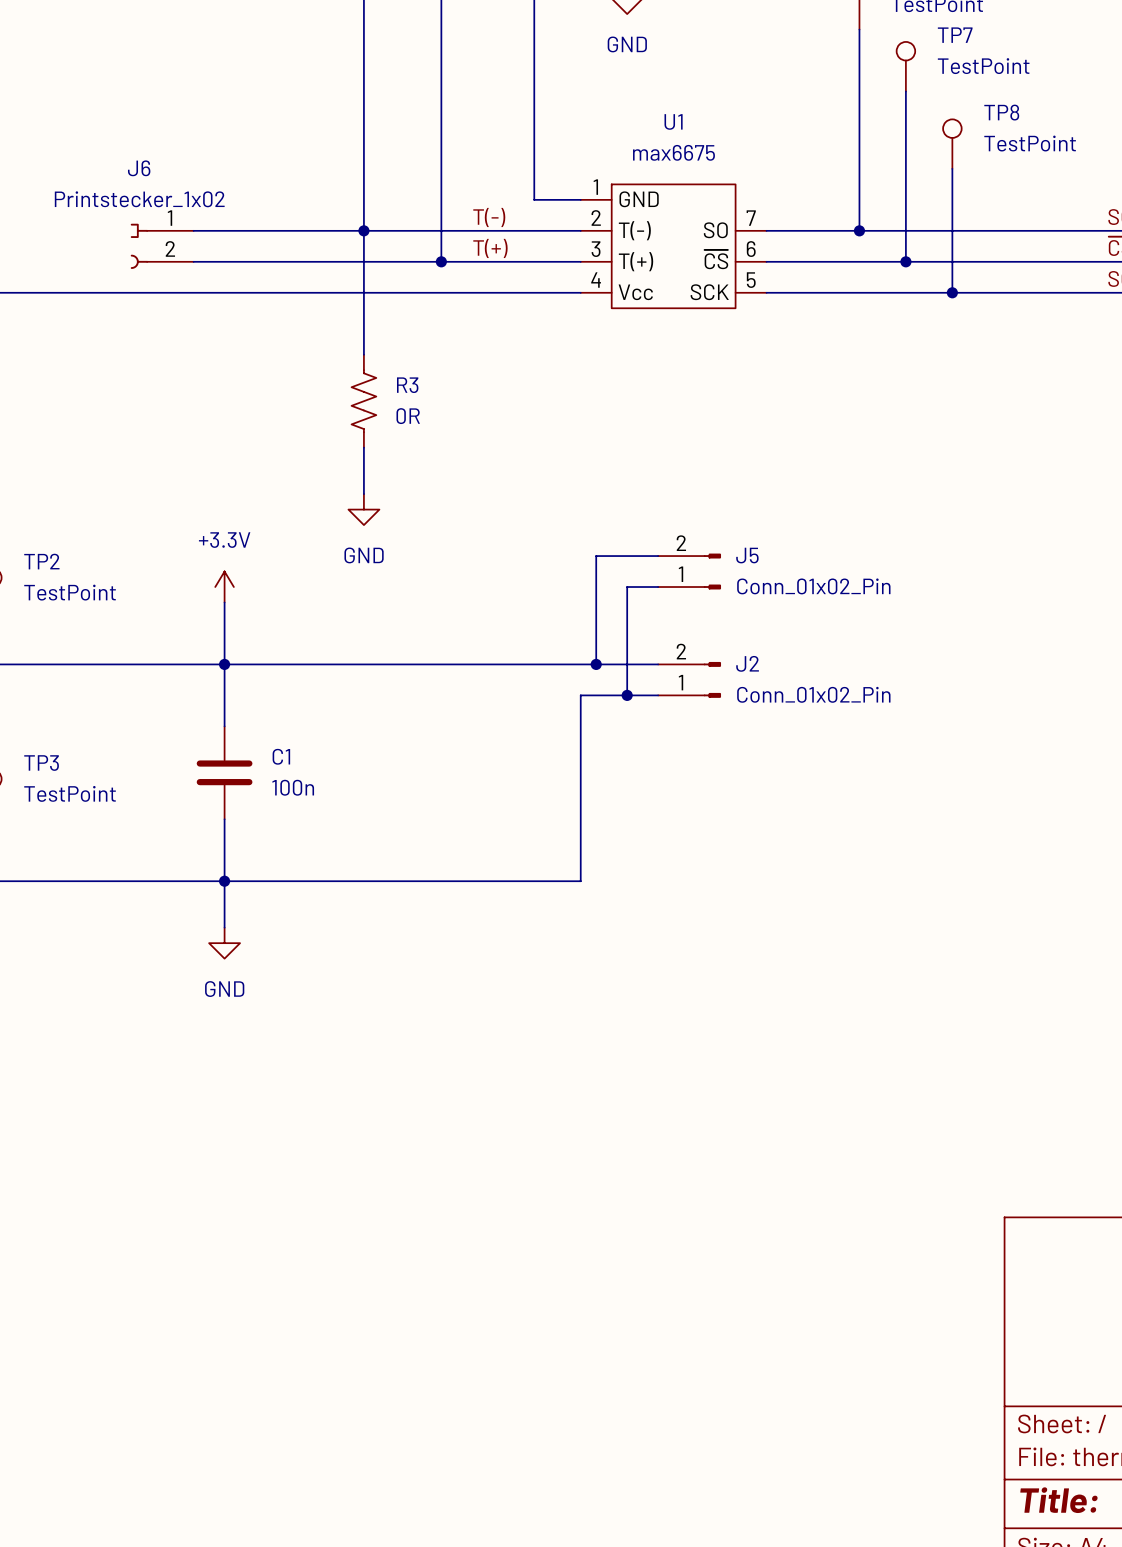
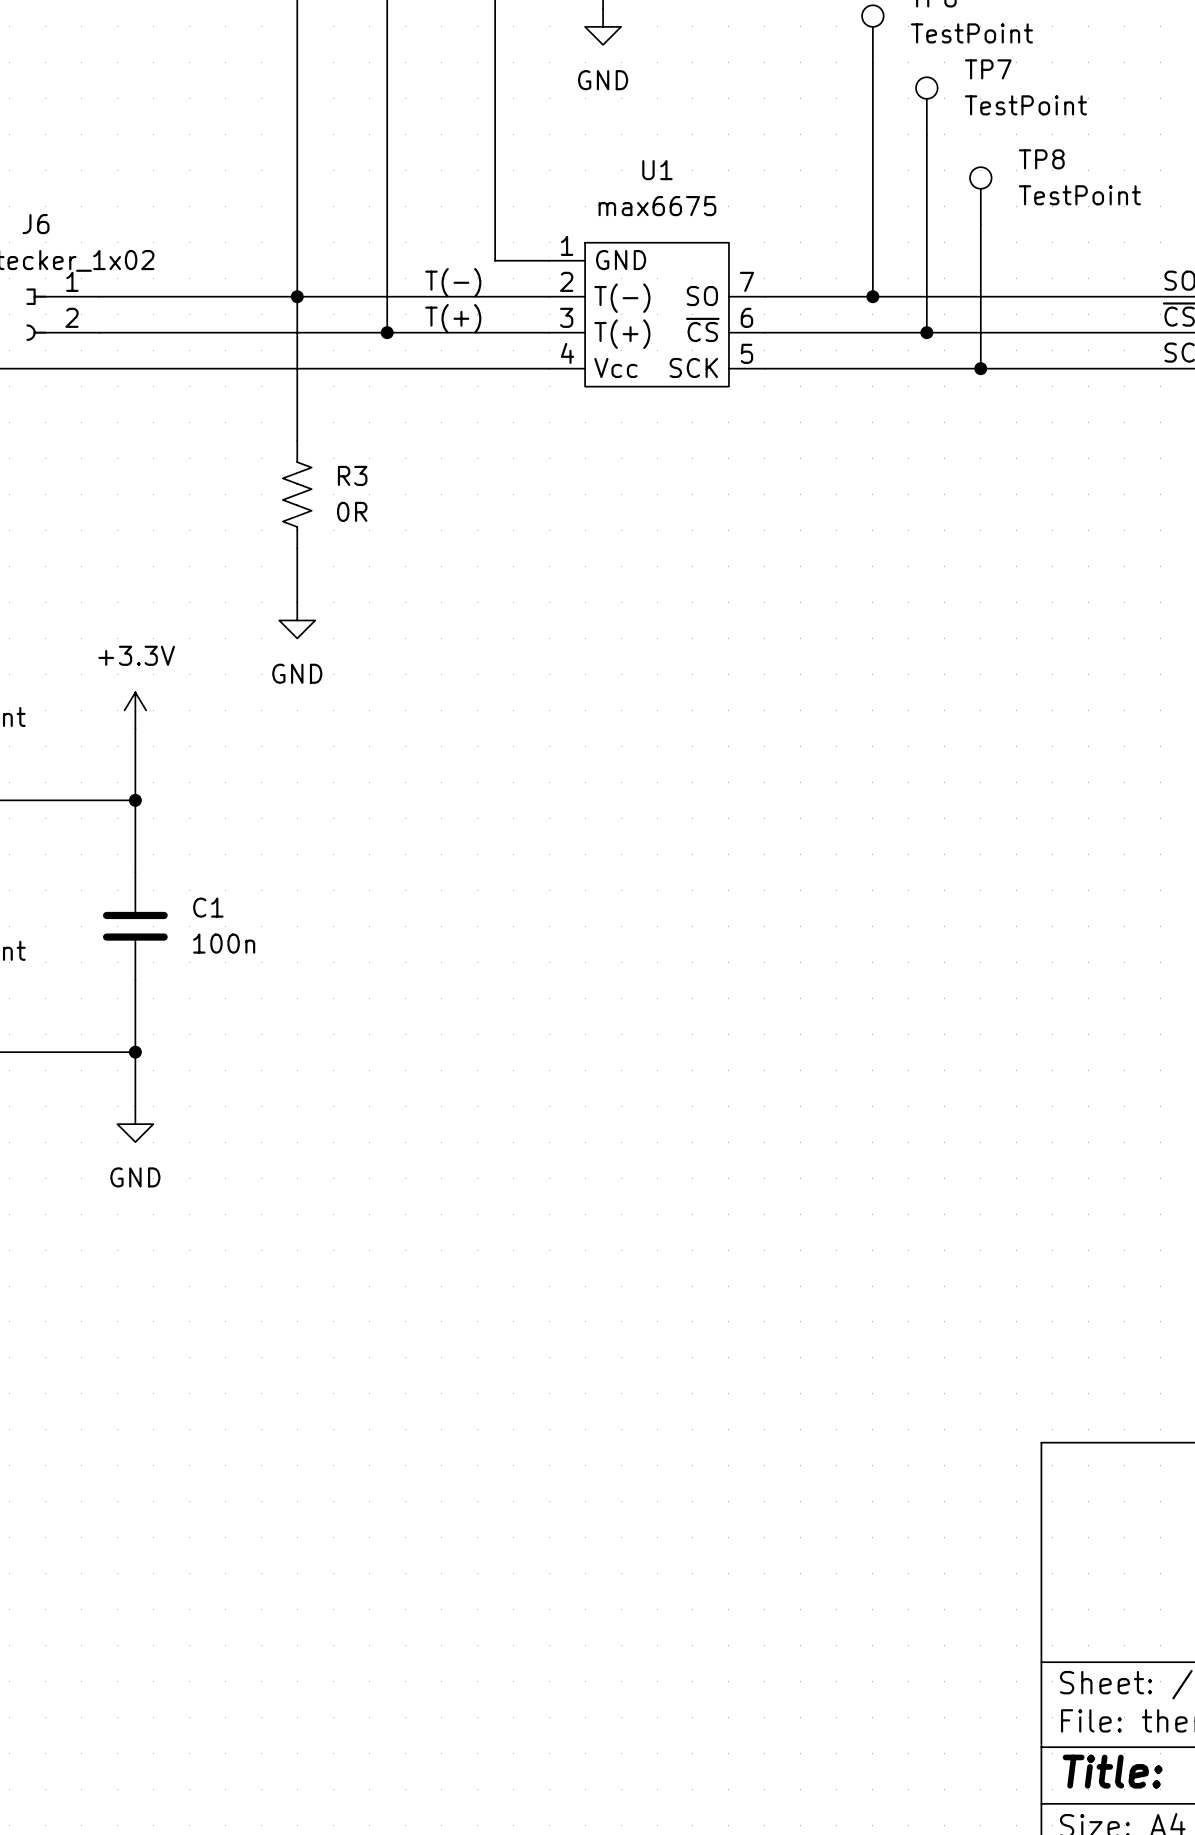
wire: (658, 556) (596, 556) (596, 664) -> none
J5: Conn_01x02_Pin (689, 571) -> none
wire: (658, 587) (627, 587) (627, 695) -> none
wire: (224, 664) (658, 664) -> none
junction: (596, 664) -> none
J2: Conn_01x02_Pin (689, 679) -> none
junction: (627, 695) -> none
wire: (658, 695) (580, 695) (580, 881) (224, 881) -> none

